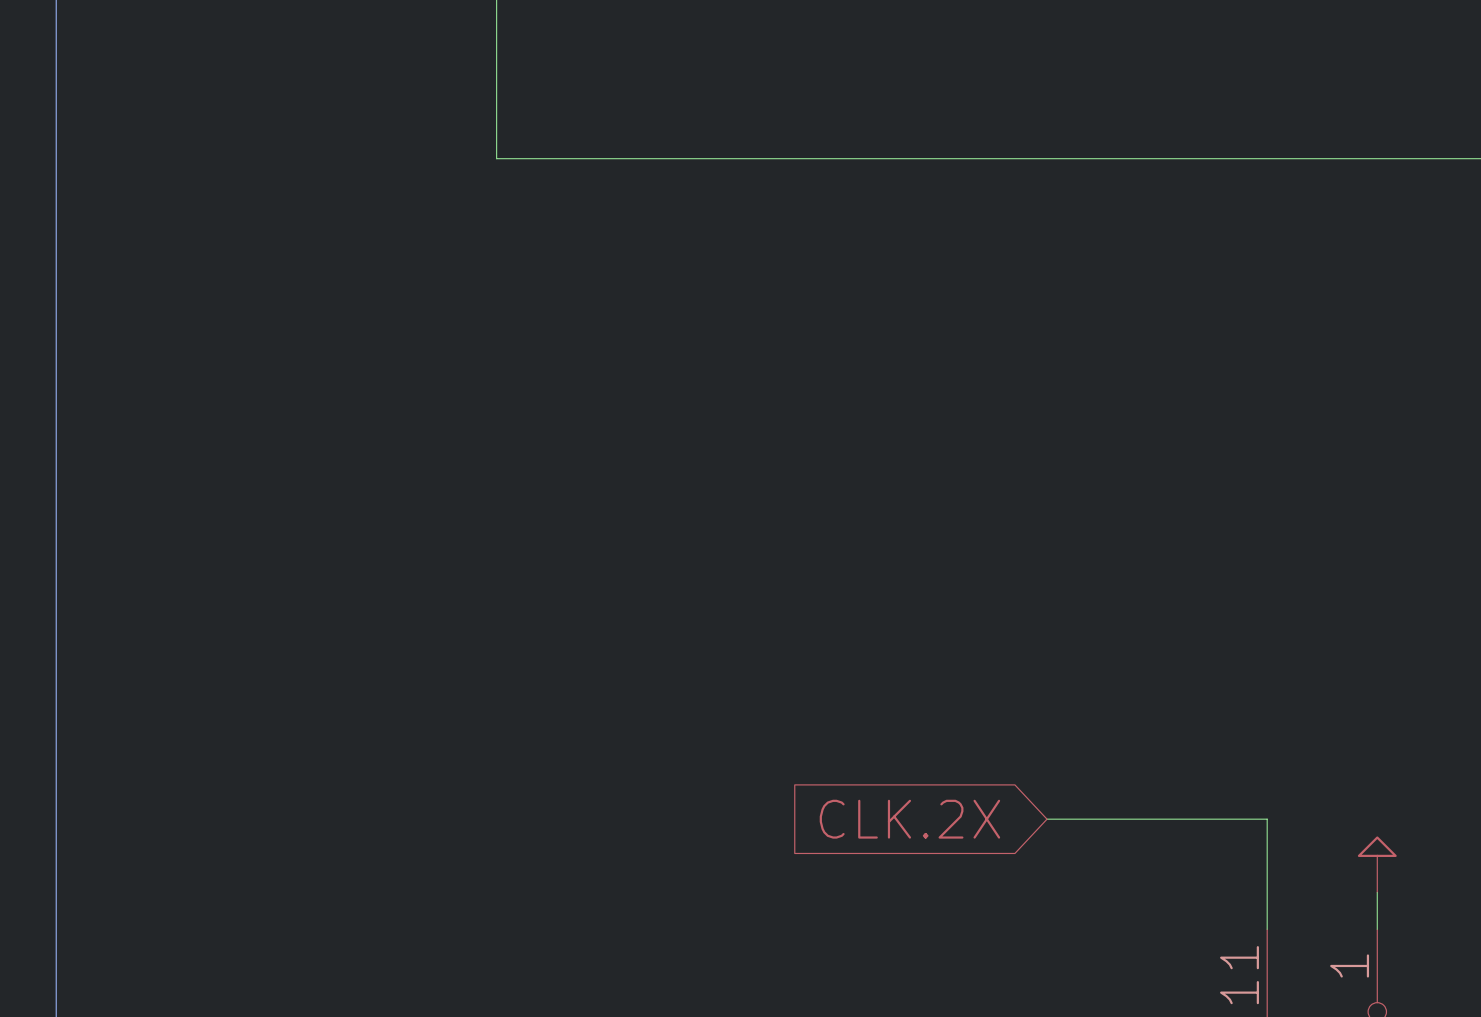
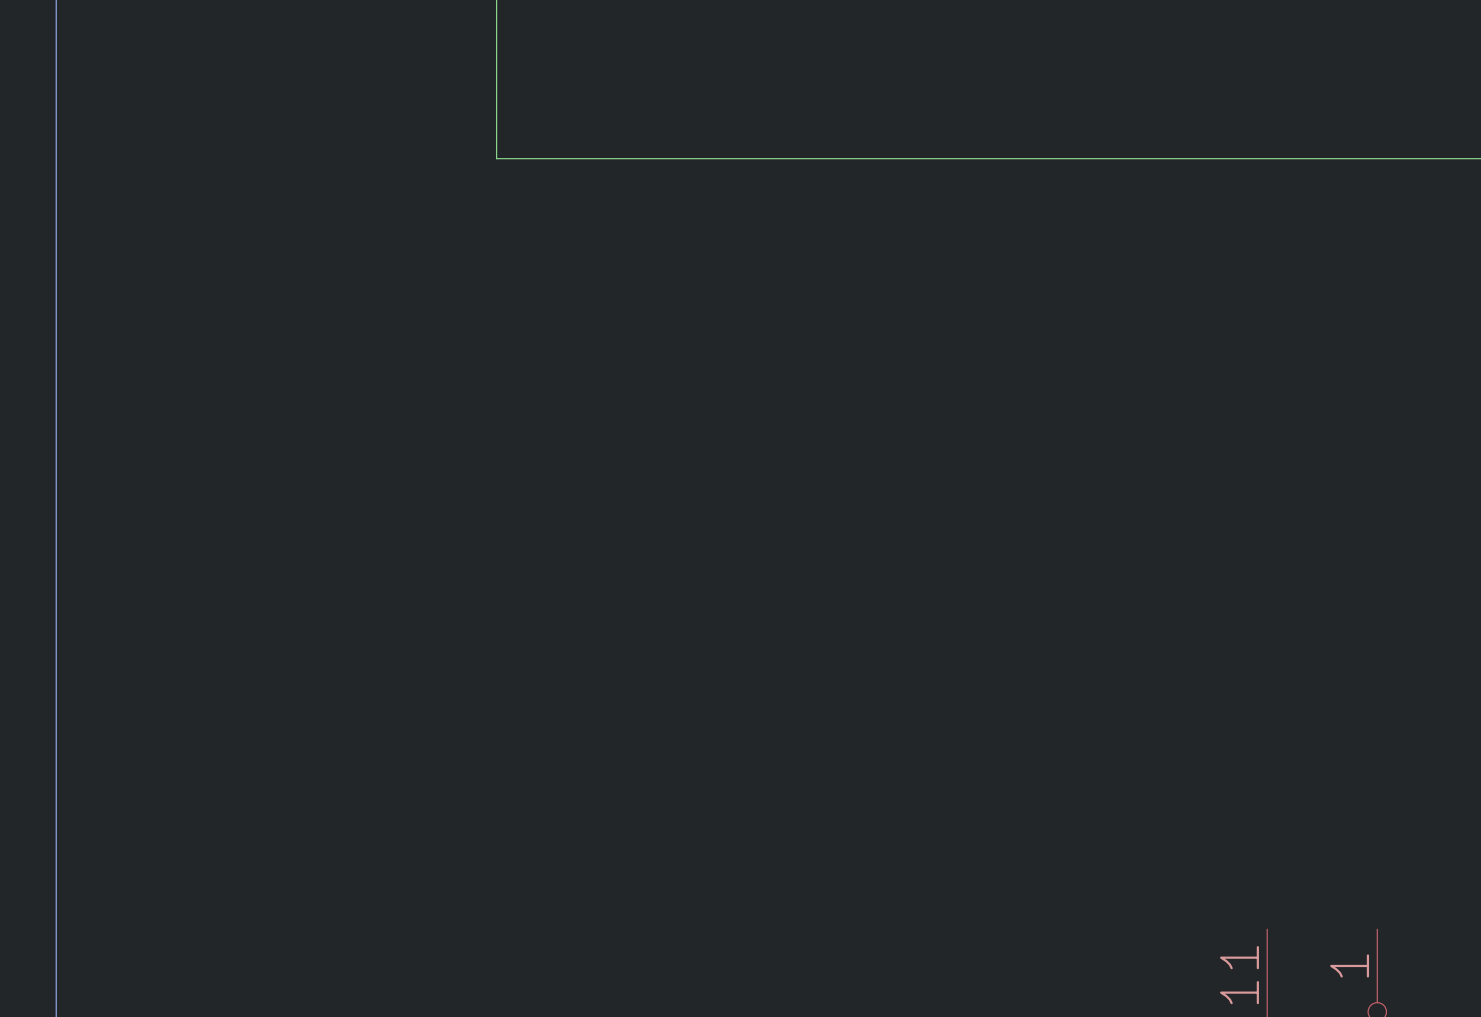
global label: CLK.2X (909, 819) -> none
wire: (1047, 819) (1267, 819) (1267, 929) -> none
power symbol: (1377, 864) -> none
wire: (1377, 892) (1377, 929) -> none

